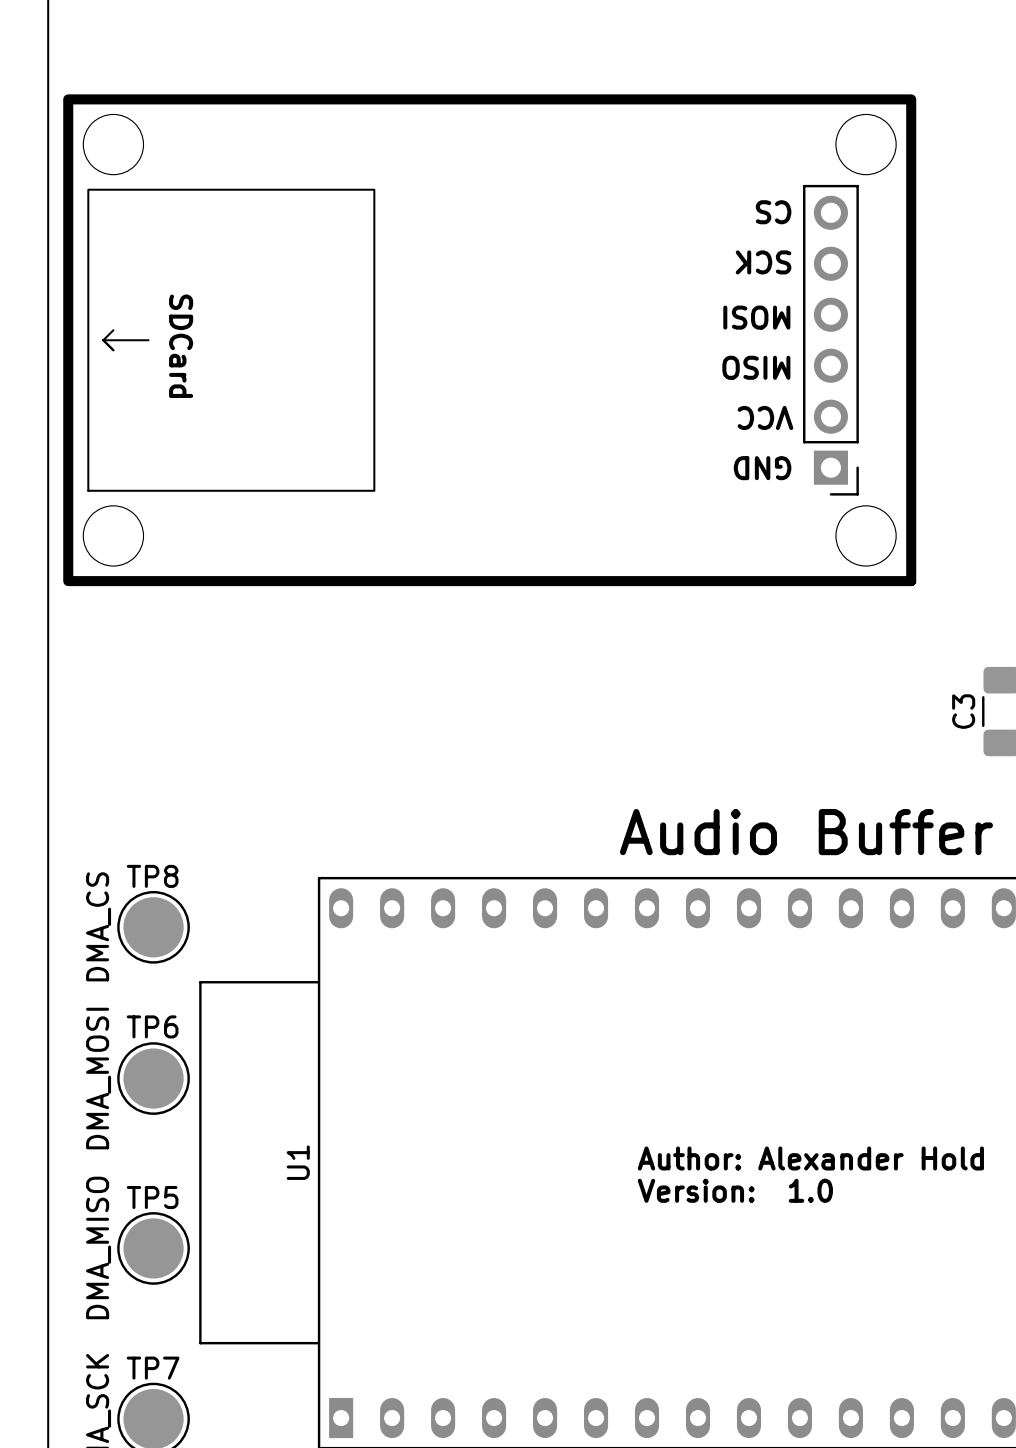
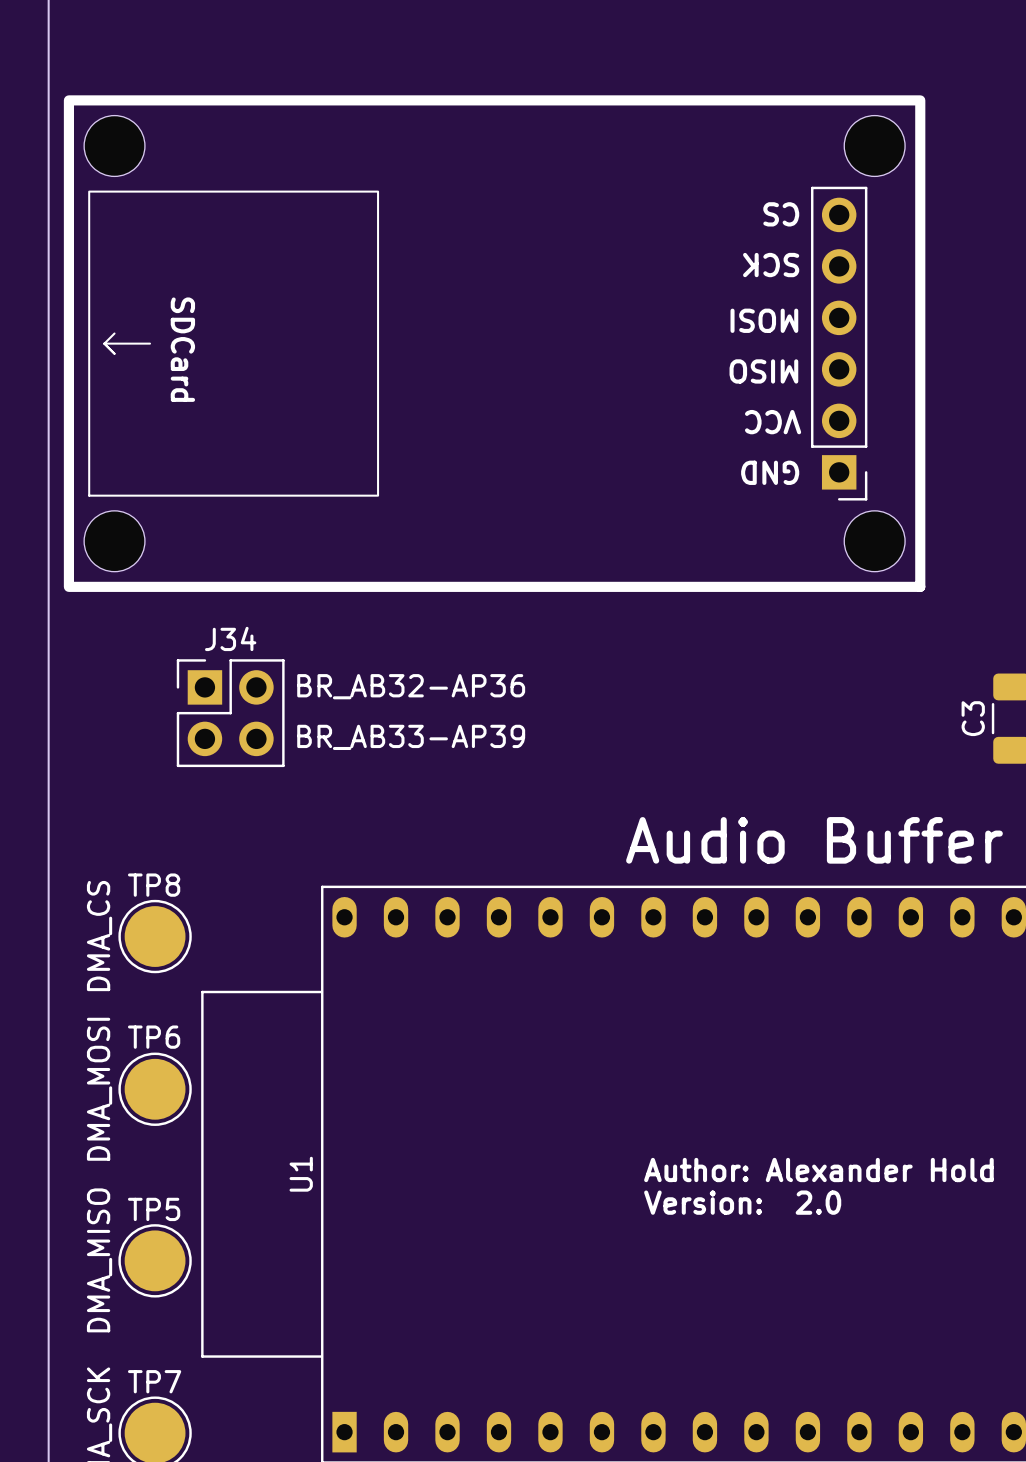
text: none -> BR_AB32-AP36 (411, 686)
J34: none -> (230, 713)
text: none -> BR_AB33-AP39 (411, 737)
text: Version: 1.0 (735, 1190) -> Version: 2.0 (742, 1202)

